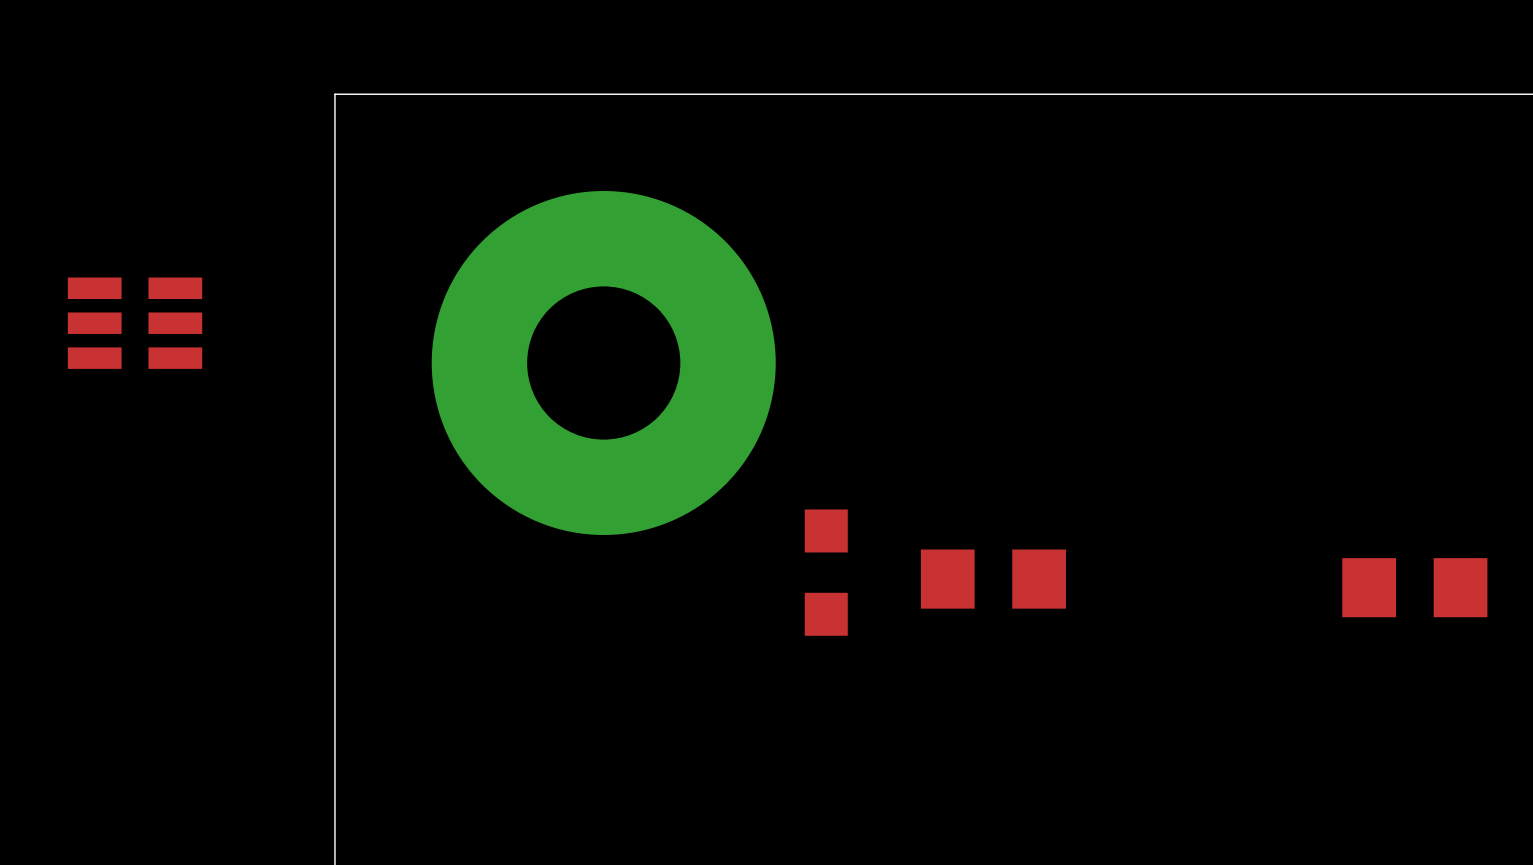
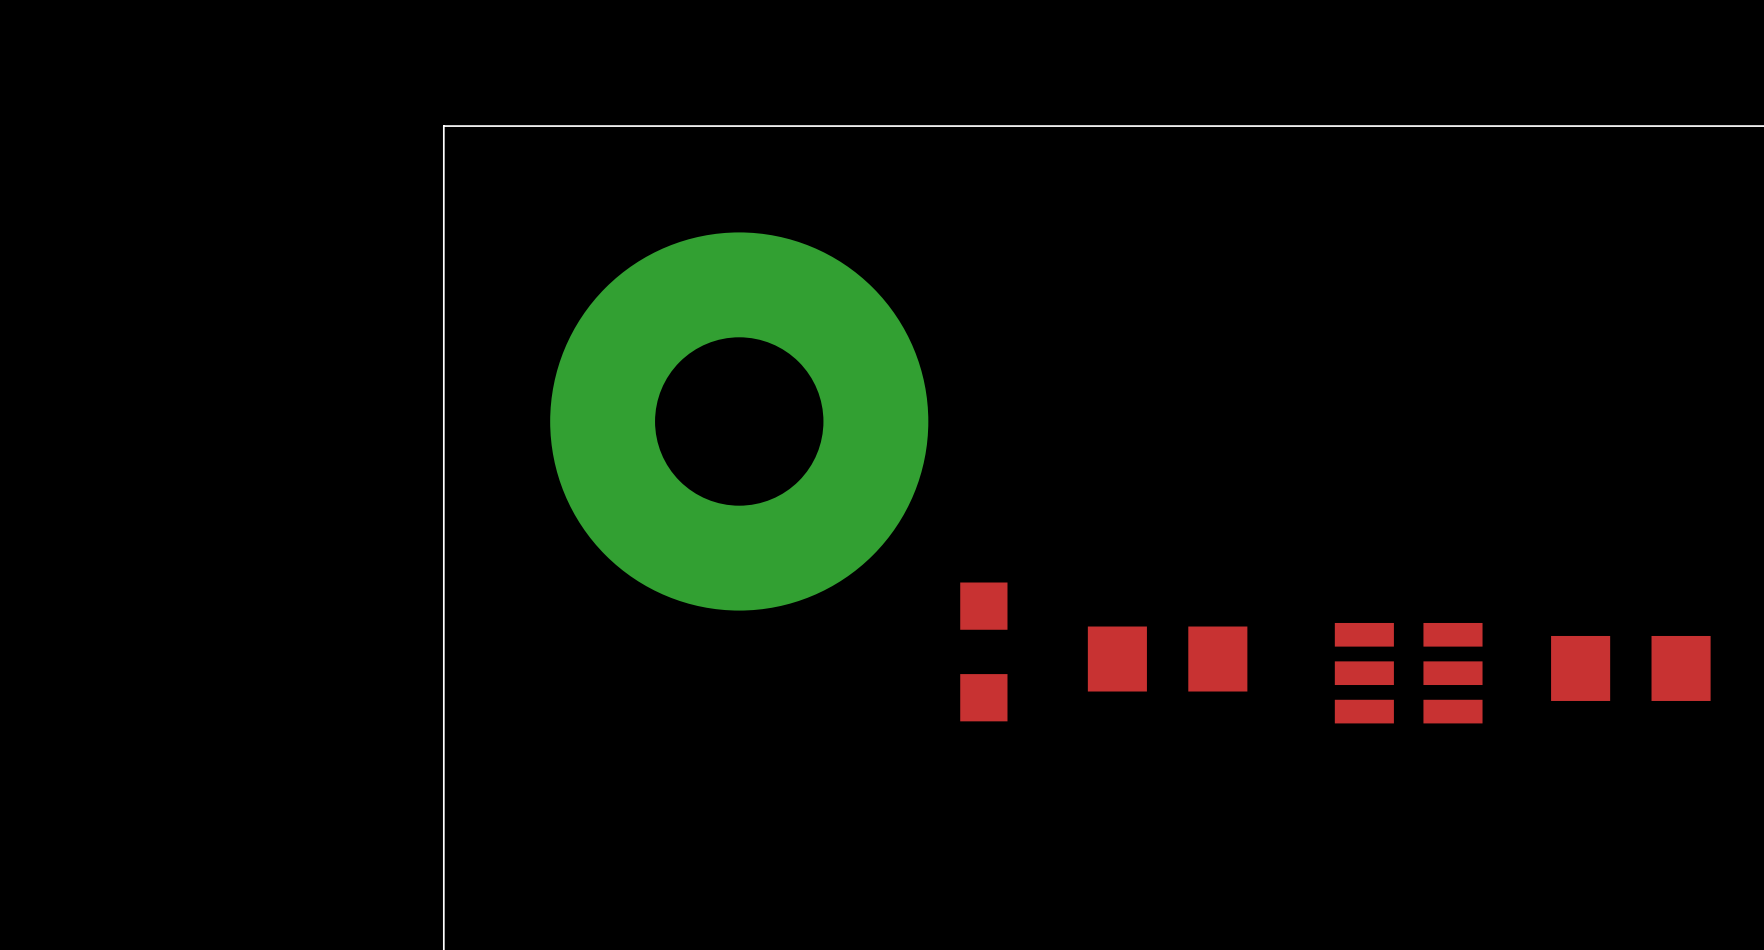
part: (135, 323) -> none
part: none -> (1408, 673)

